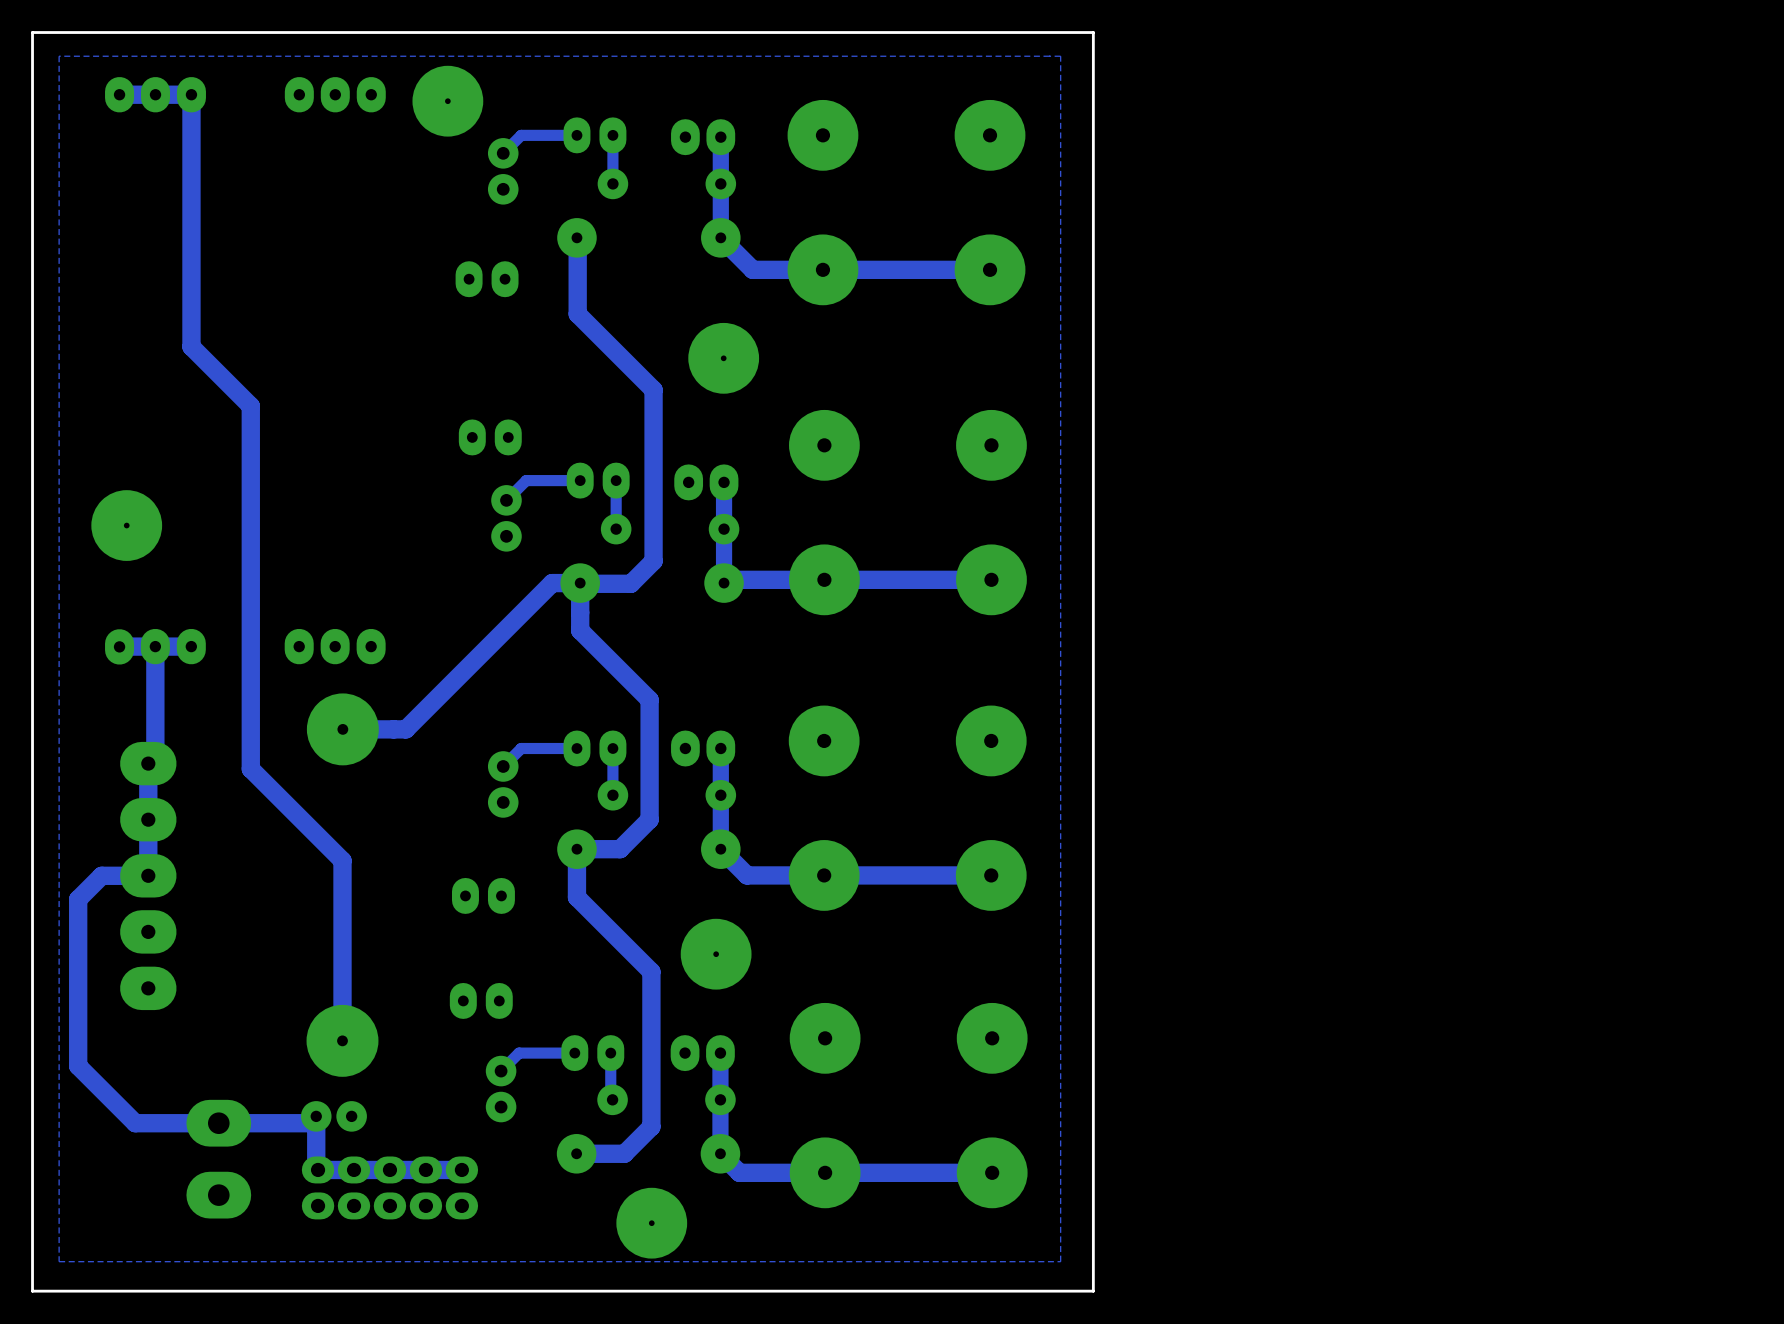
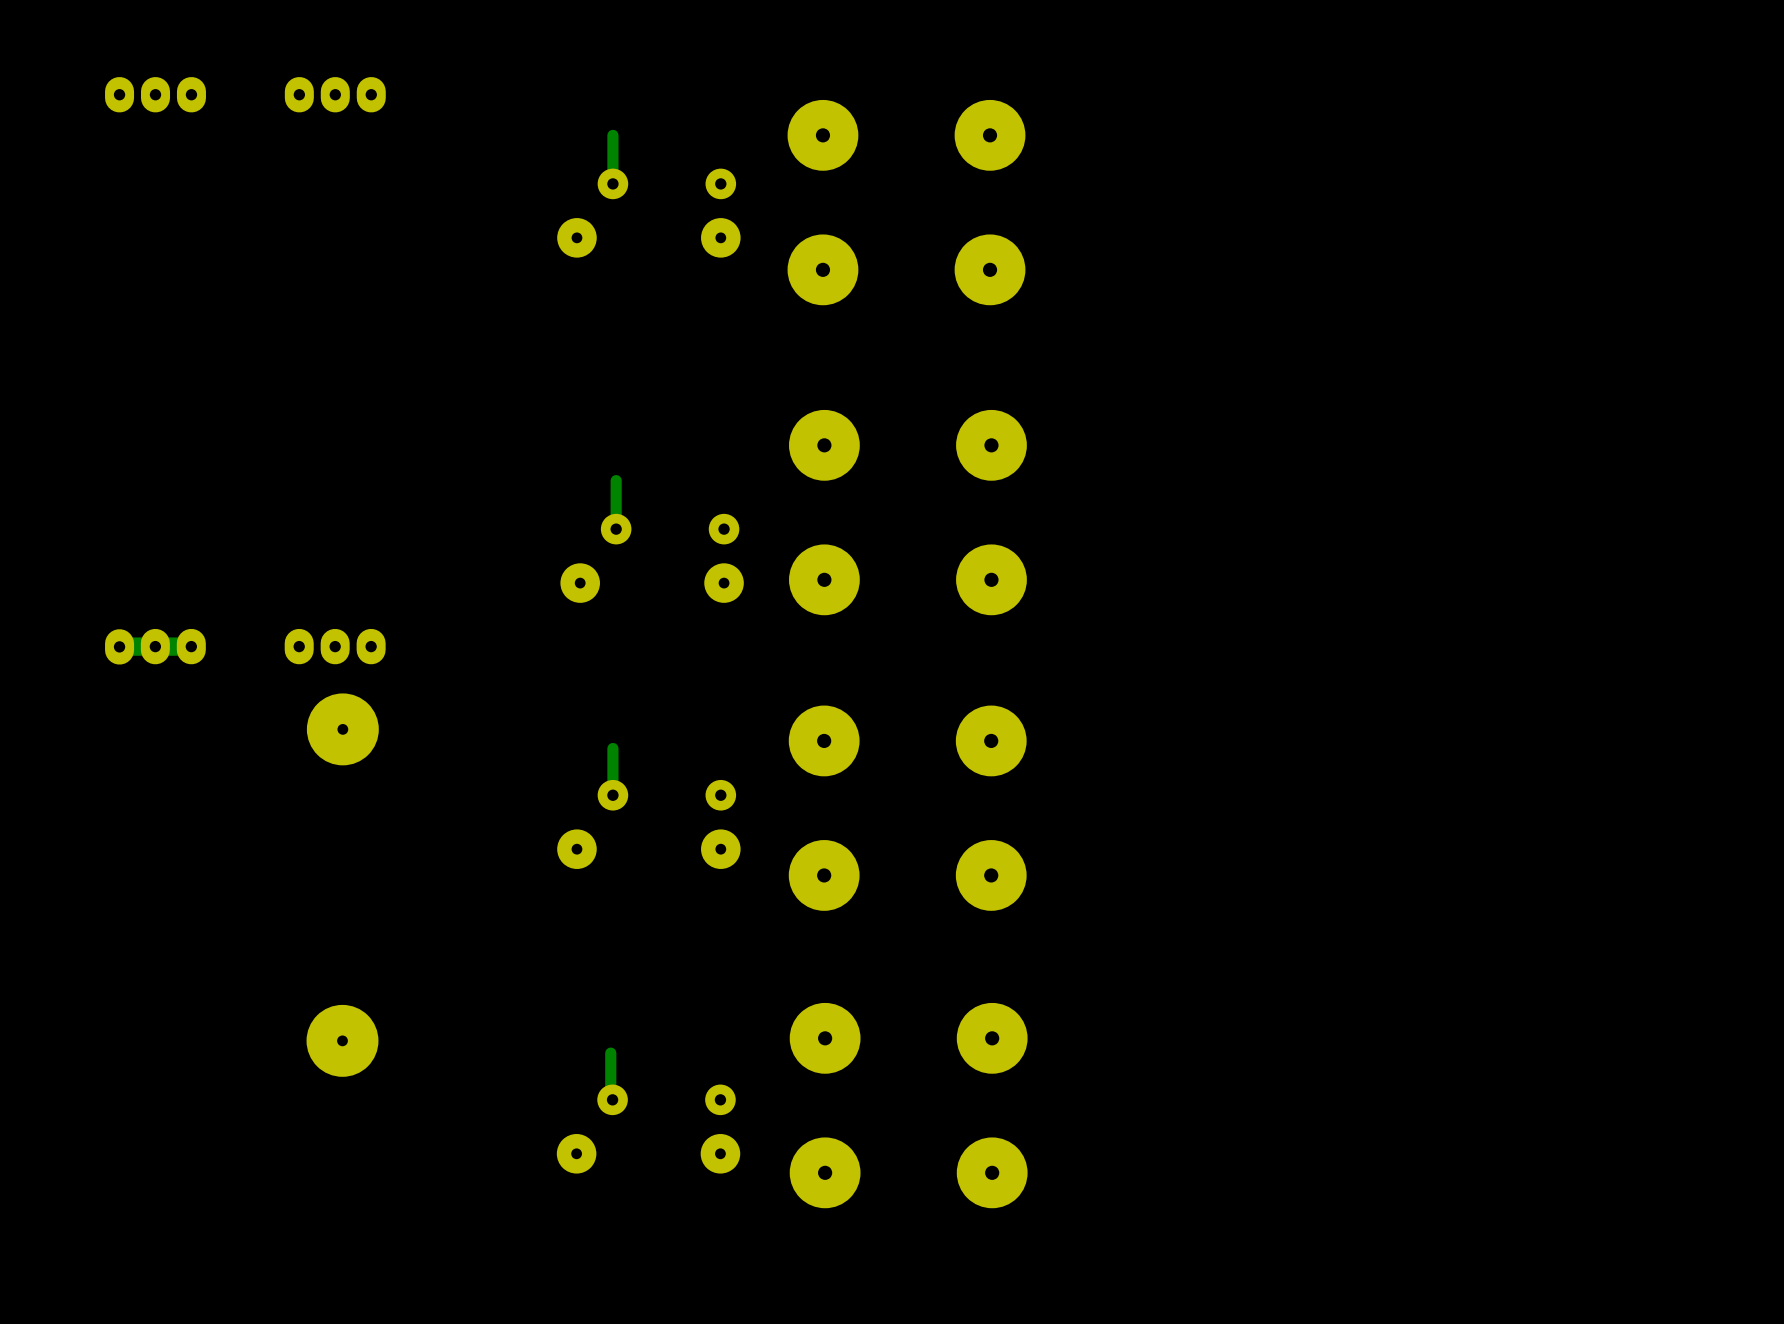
board edge: (1093, 32) (32, 32) (32, 1291) (1093, 1291) (1093, 32) -> none
bottom zone outline: (1060, 56) (59, 56) (59, 1261) (1060, 1261) (1060, 56) -> none
bottom track: (119, 94) (191, 94) (191, 346) (250, 406) (250, 769) (342, 860) (342, 1040) -> none
via: (447, 101) -> none
bottom track: (576, 135) (521, 135) (503, 153) -> none
part: (594, 135) -> none
part: (703, 137) -> none
bottom track: (720, 137) (720, 237) (752, 269) (990, 269) -> none
part: (503, 171) -> none
bottom track: (578, 237) (576, 237) (577, 314) (653, 389) (653, 561) (630, 583) (580, 583) -> none
part: (487, 279) -> none
via: (723, 358) -> none
part: (490, 437) -> none
bottom track: (580, 480) (526, 480) (506, 500) -> none
part: (598, 480) -> none
part: (706, 482) -> none
bottom track: (724, 482) (724, 583) (727, 579) (991, 579) -> none
part: (506, 518) -> none
via: (126, 525) -> none
bottom track: (580, 583) (580, 630) (649, 699) (649, 819) (620, 849) (576, 849) (576, 897) (651, 971) (651, 1126) (624, 1153) (576, 1153) -> none
bottom track: (580, 583) (552, 583) (405, 729) (342, 729) -> none
bottom track: (155, 646) (155, 756) (148, 763) (148, 875) (101, 875) (78, 899) (78, 1066) (135, 1123) (309, 1123) (316, 1116) (316, 1168) (318, 1169) (461, 1169) -> none
bottom track: (576, 748) (521, 748) (503, 766) -> none
part: (594, 748) -> none
part: (703, 748) -> none
bottom track: (720, 748) (720, 849) (747, 875) (991, 875) -> none
part: (503, 784) -> none
part: (148, 875) -> none
part: (483, 895) -> none
via: (716, 954) -> none
part: (481, 1000) -> none
bottom track: (574, 1053) (519, 1053) (501, 1071) -> none
part: (592, 1053) -> none
part: (702, 1053) -> none
bottom track: (720, 1053) (720, 1153) (739, 1172) (992, 1172) -> none
part: (501, 1089) -> none
part: (333, 1116) -> none
part: (218, 1159) -> none
part: (389, 1187) -> none
via: (651, 1223) -> none

